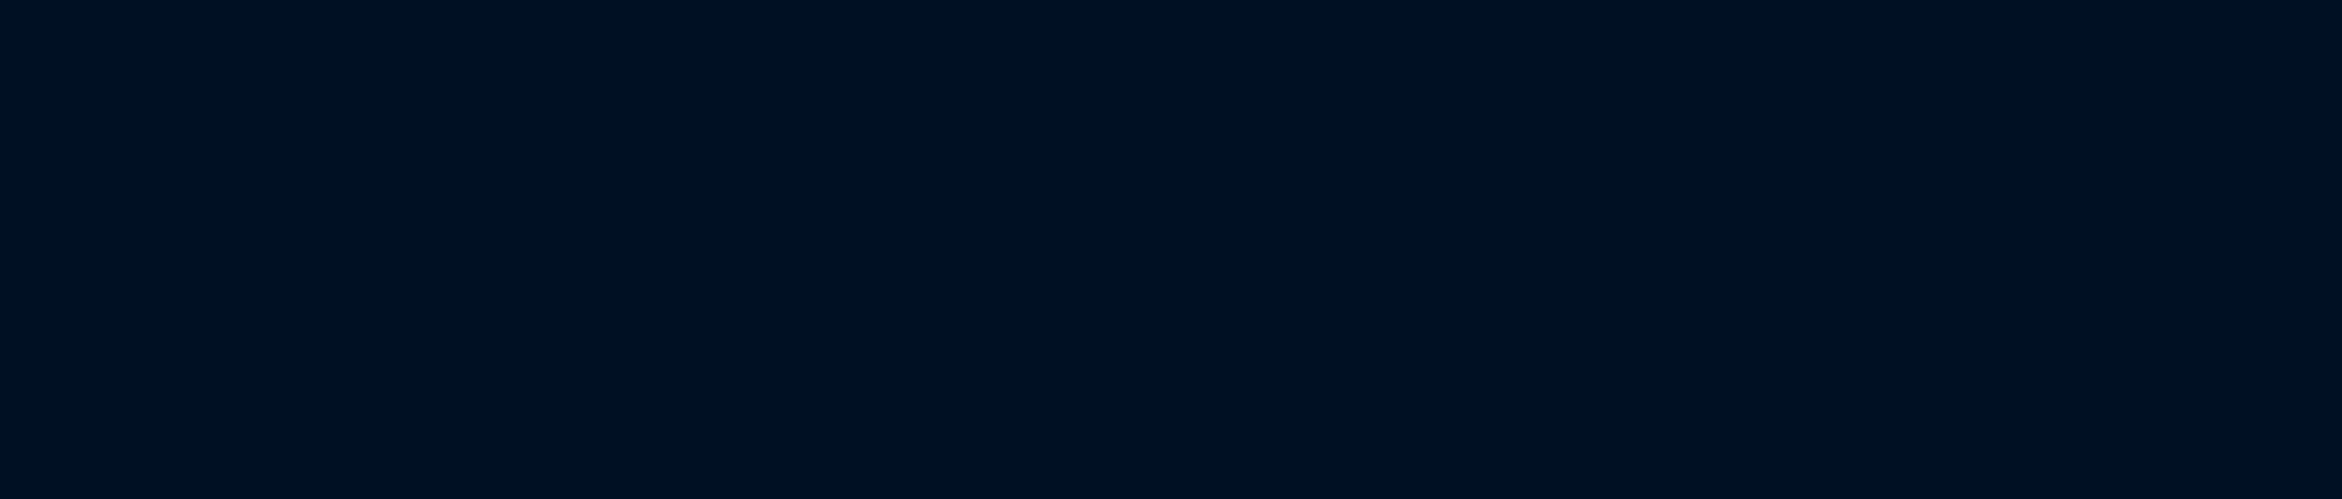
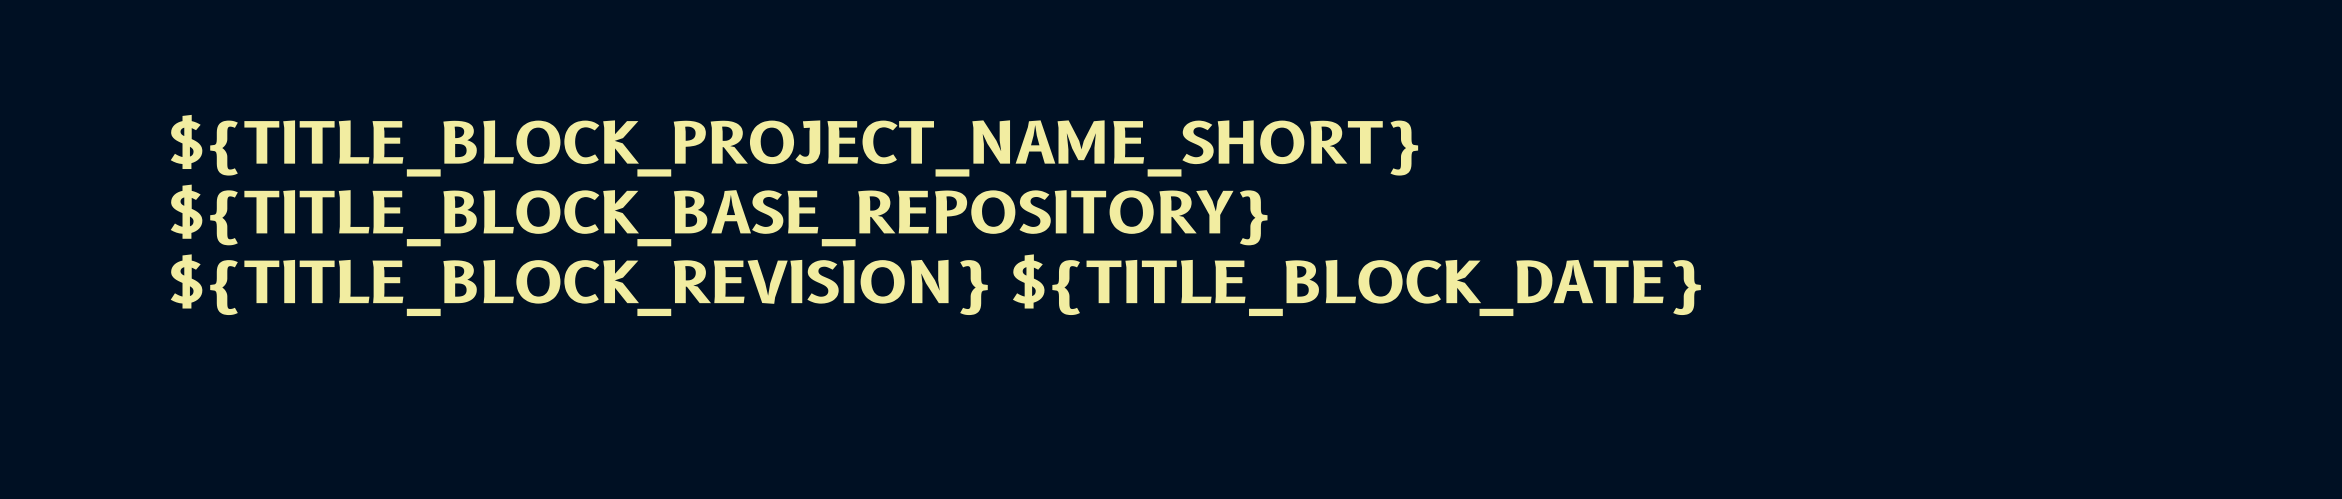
text: none -> ${TITLE_BLOCK_PROJECT_NAME_SHORT} (794, 145)
text: none -> ${TITLE_BLOCK_BASE_REPOSITORY} (719, 215)
text: none -> ${TITLE_BLOCK_REVISION} ${TITLE_BLOCK_DATE} (935, 285)

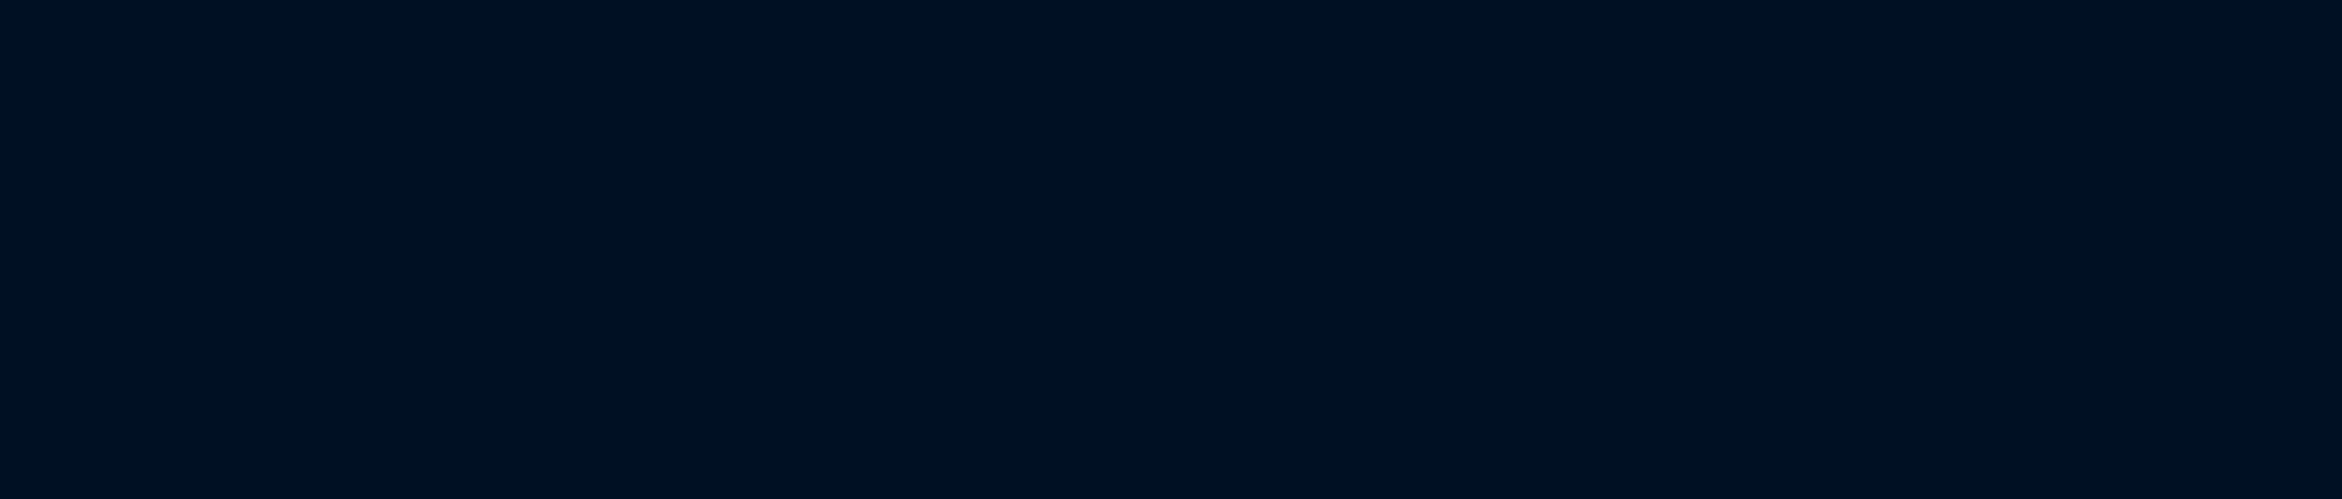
text: ${TITLE_BLOCK_PROJECT_NAME_SHORT} (794, 145) -> none
text: ${TITLE_BLOCK_BASE_REPOSITORY} (719, 215) -> none
text: ${TITLE_BLOCK_REVISION} ${TITLE_BLOCK_DATE} (935, 285) -> none

